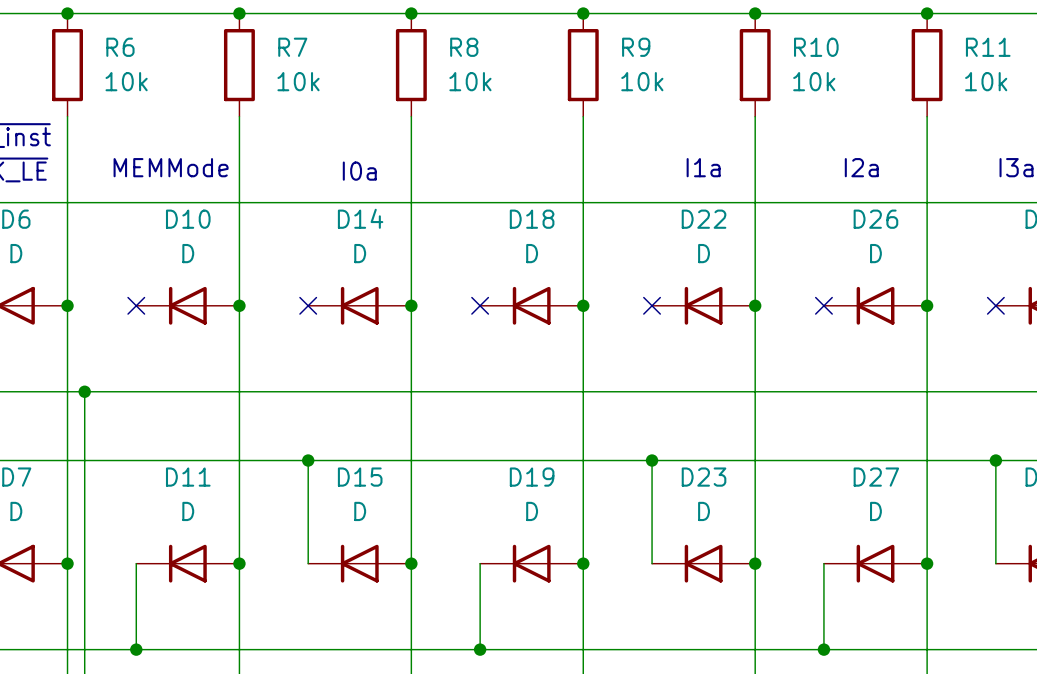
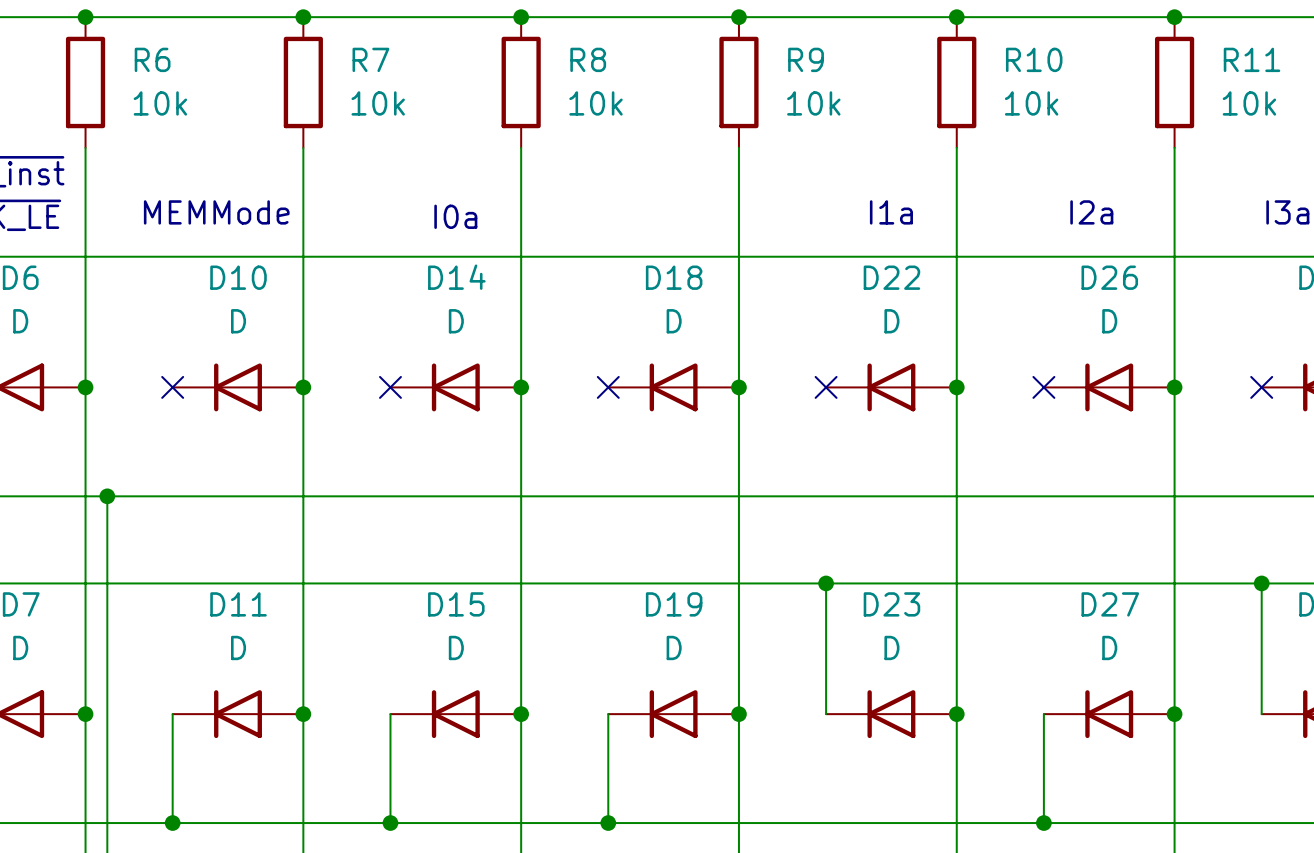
wire: (308, 460) (308, 563) -> (390, 823) (390, 714)
junction: (308, 460) -> none
junction: none -> (390, 823)

